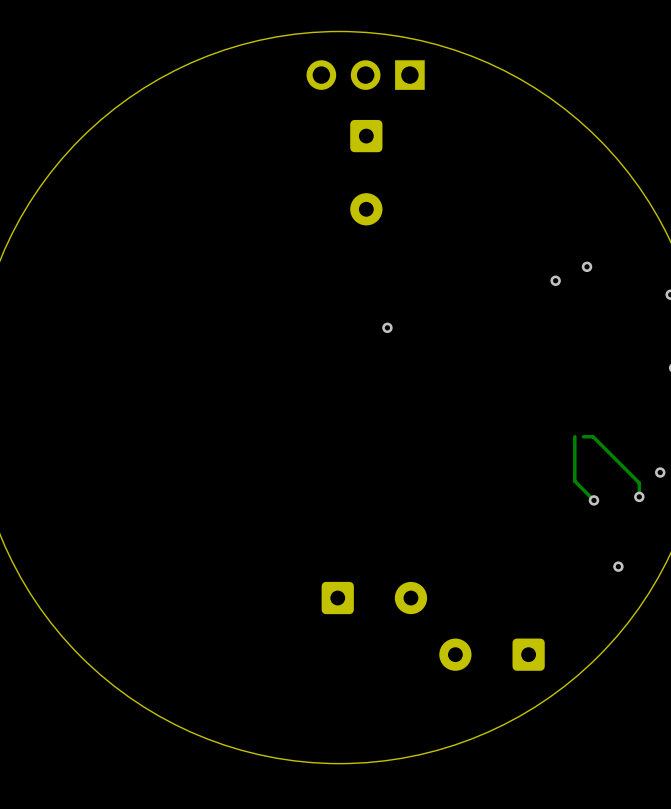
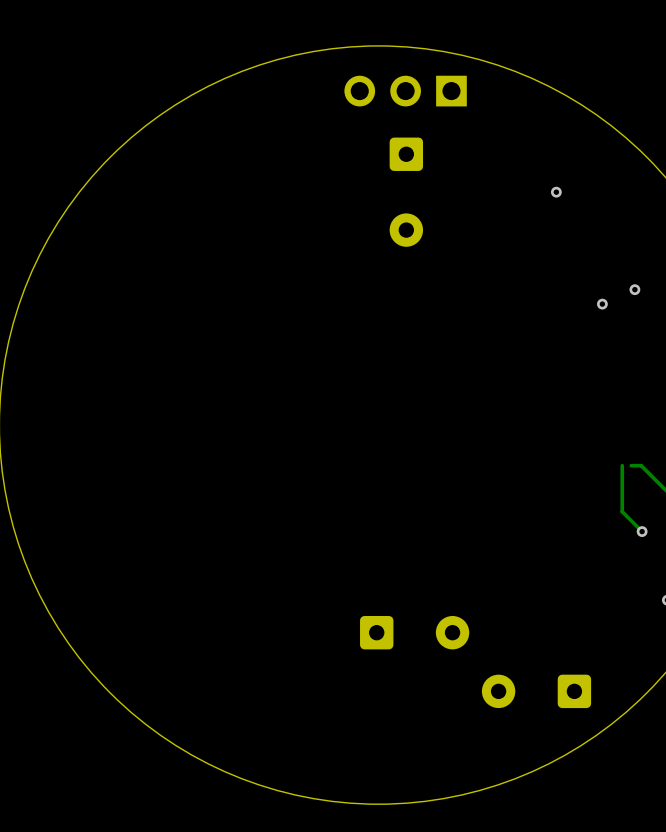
via: none -> (556, 192)
via: (387, 327) -> none

